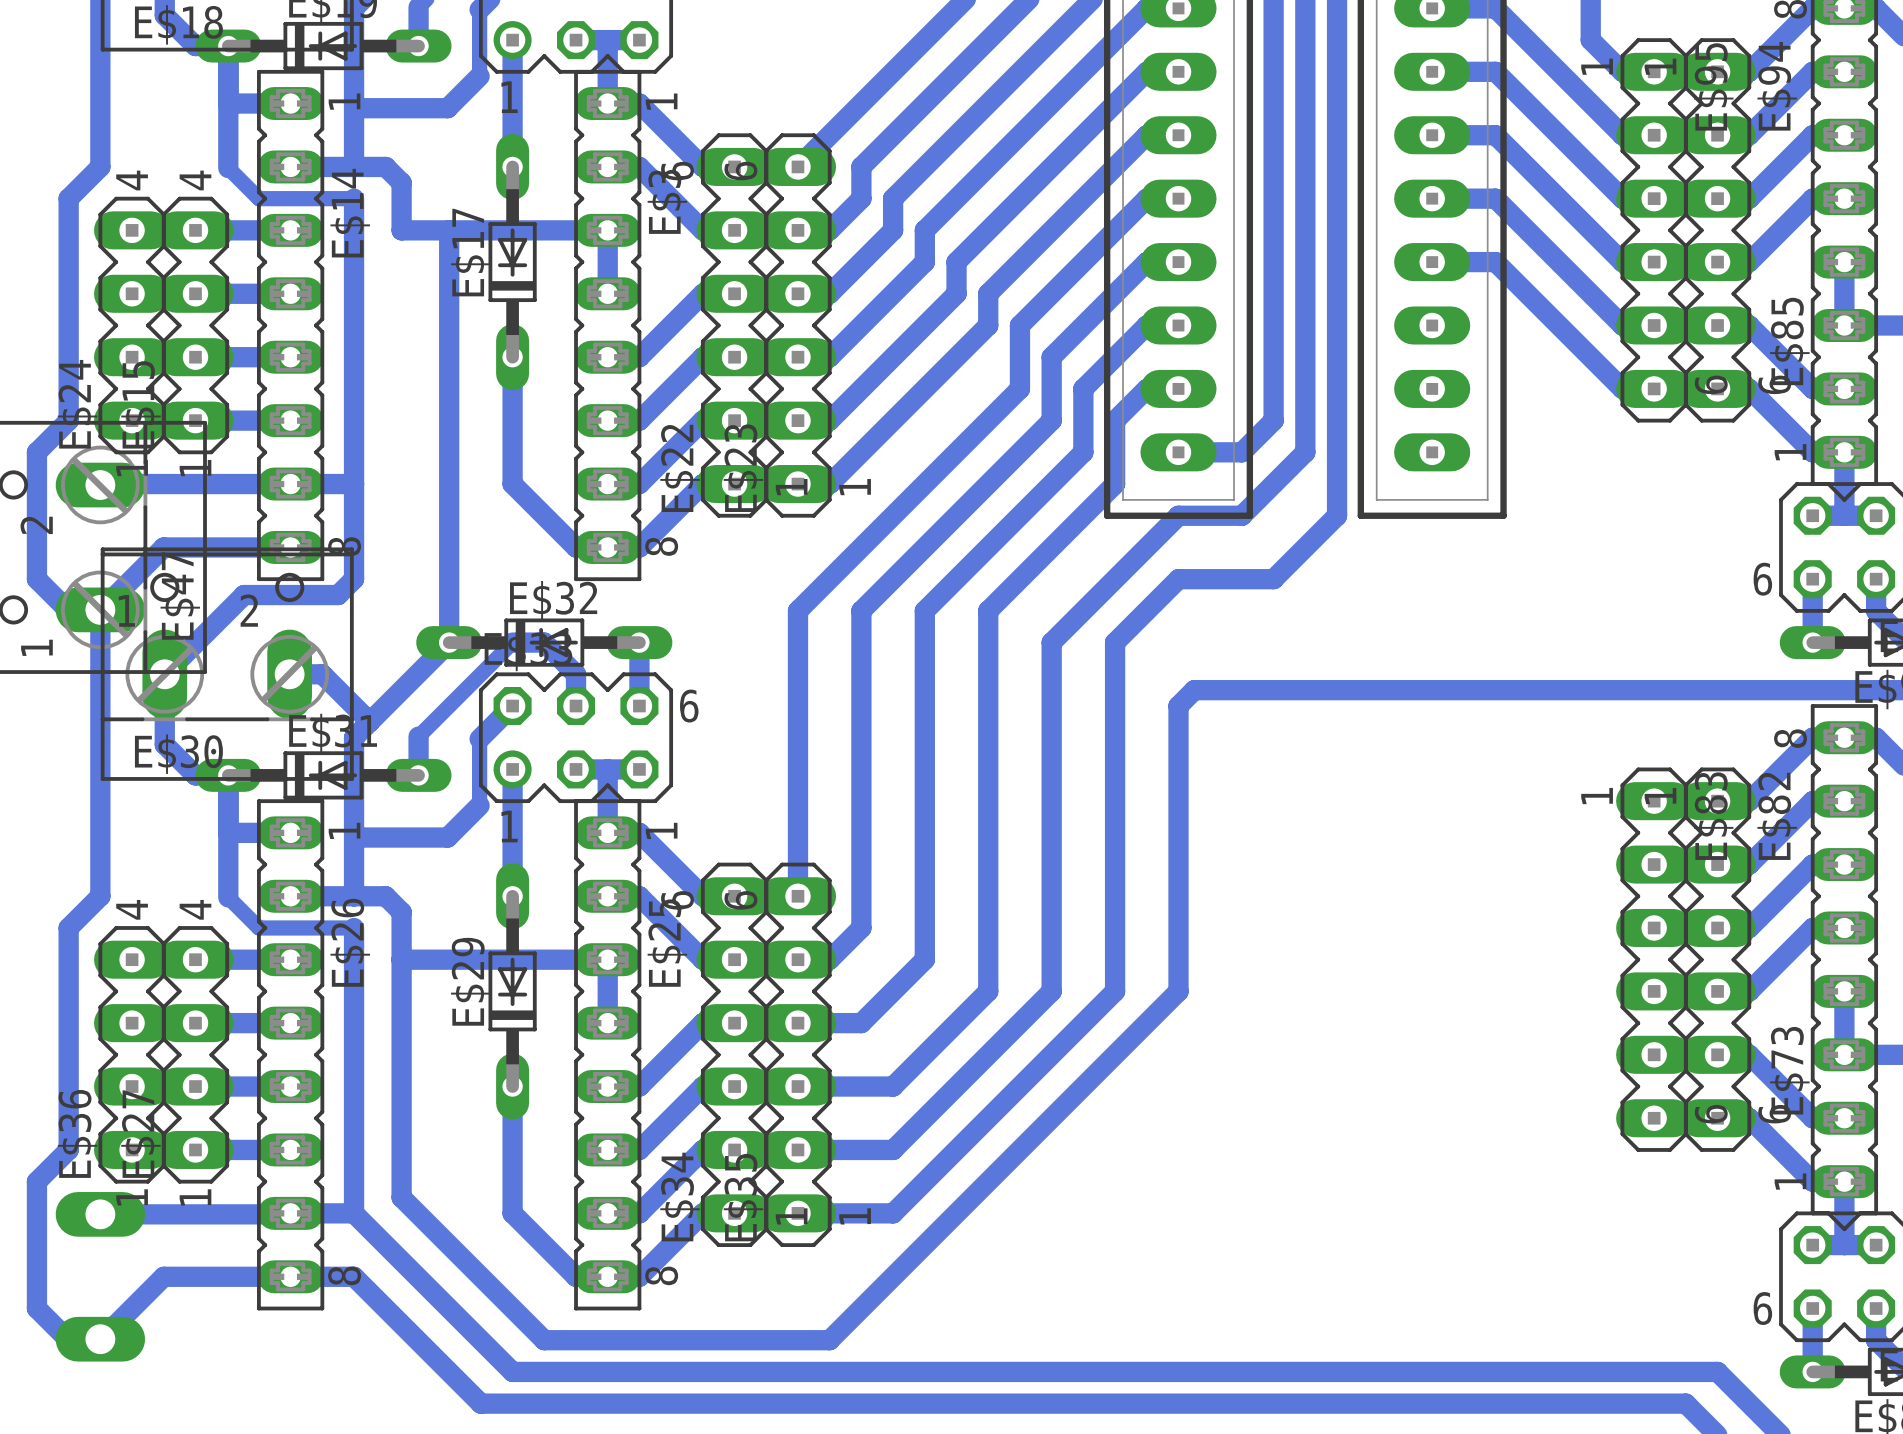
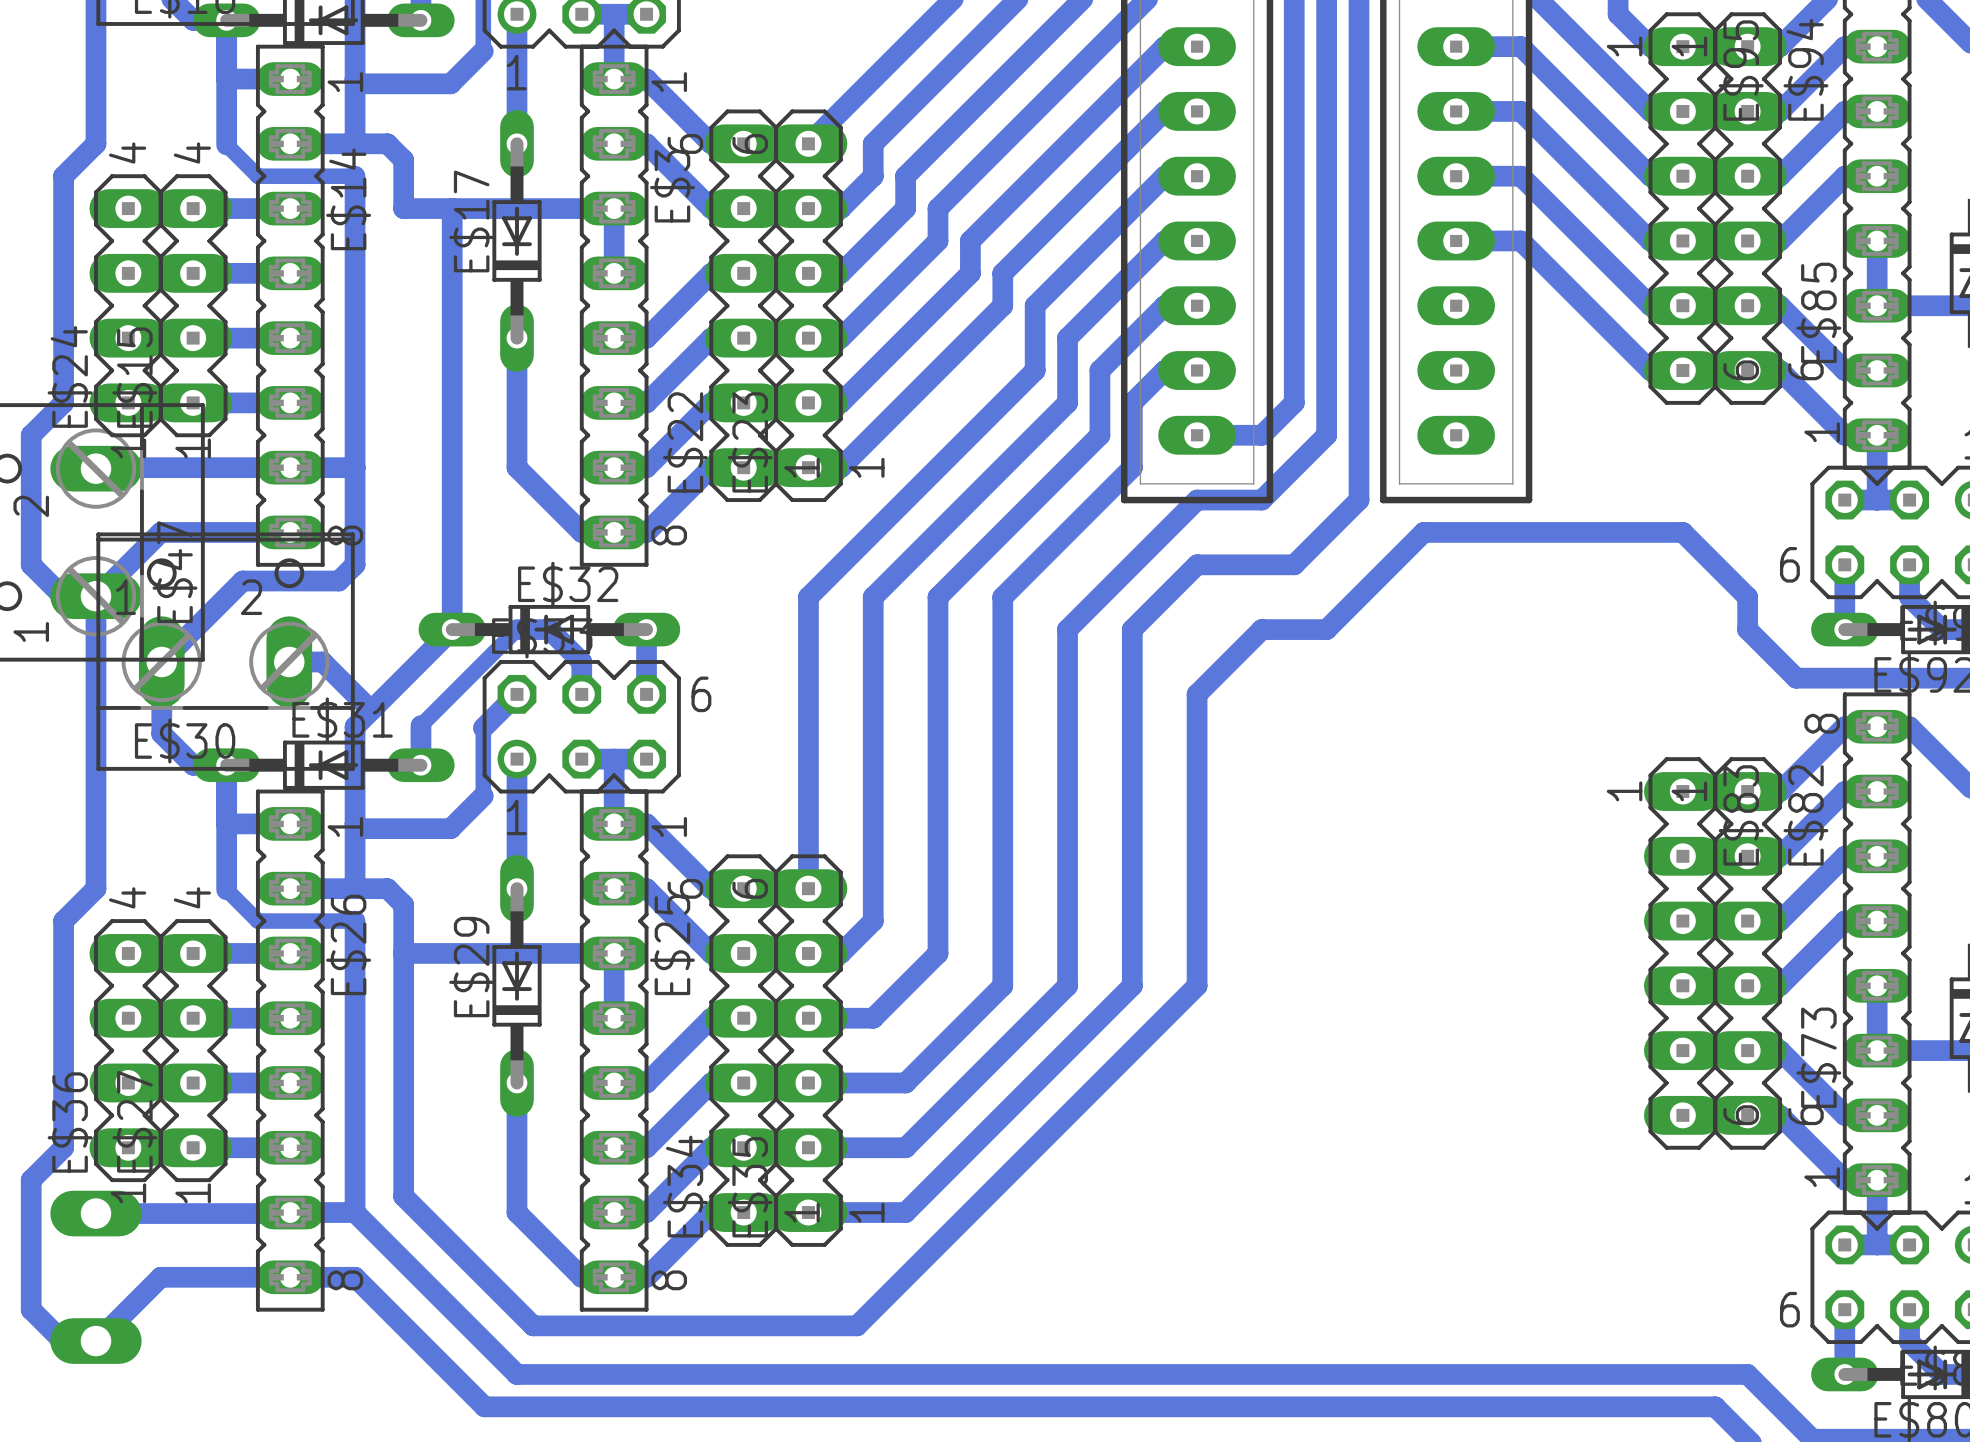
bottom track: (1194, 690) (1765, 690) -> (1213, 678) (1261, 629) (1326, 629) (1423, 532) (1682, 532) (1747, 597) (1747, 629) (1796, 678)
bottom track: (528, 1324) (544, 1340) (829, 1340) (845, 1324) -> (533, 1325) (857, 1325)

